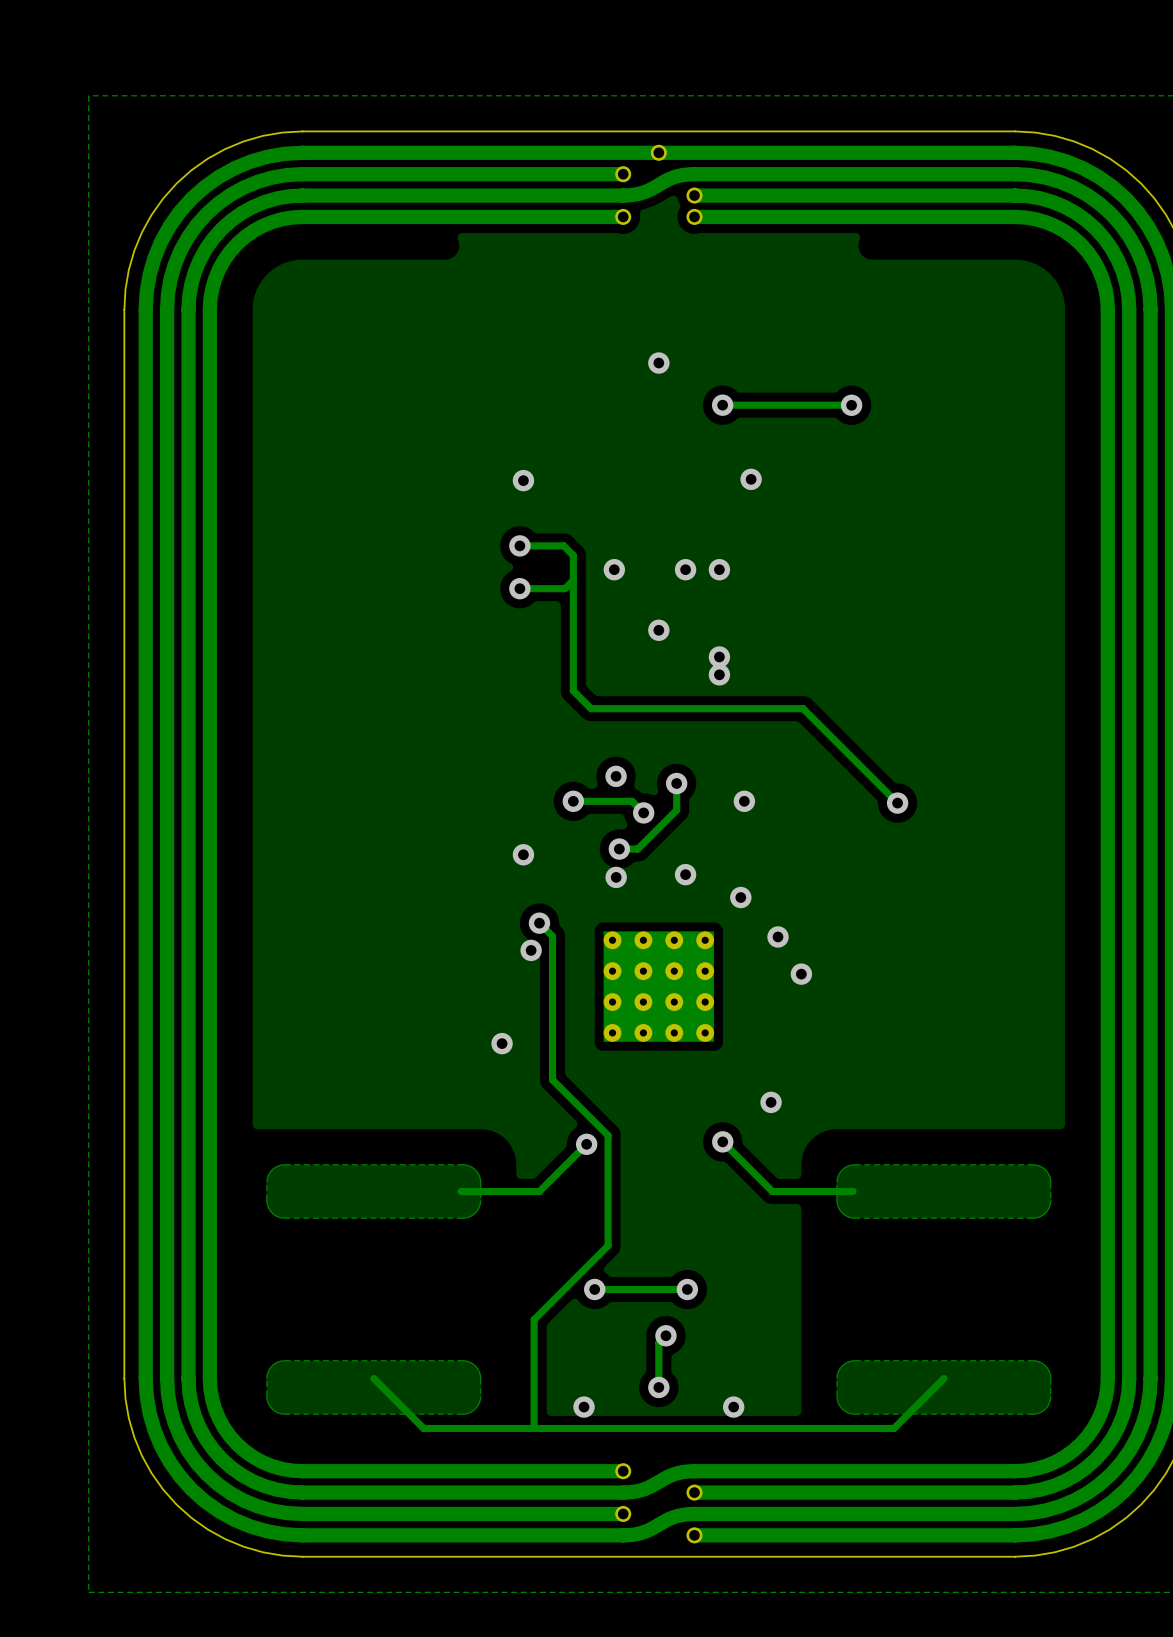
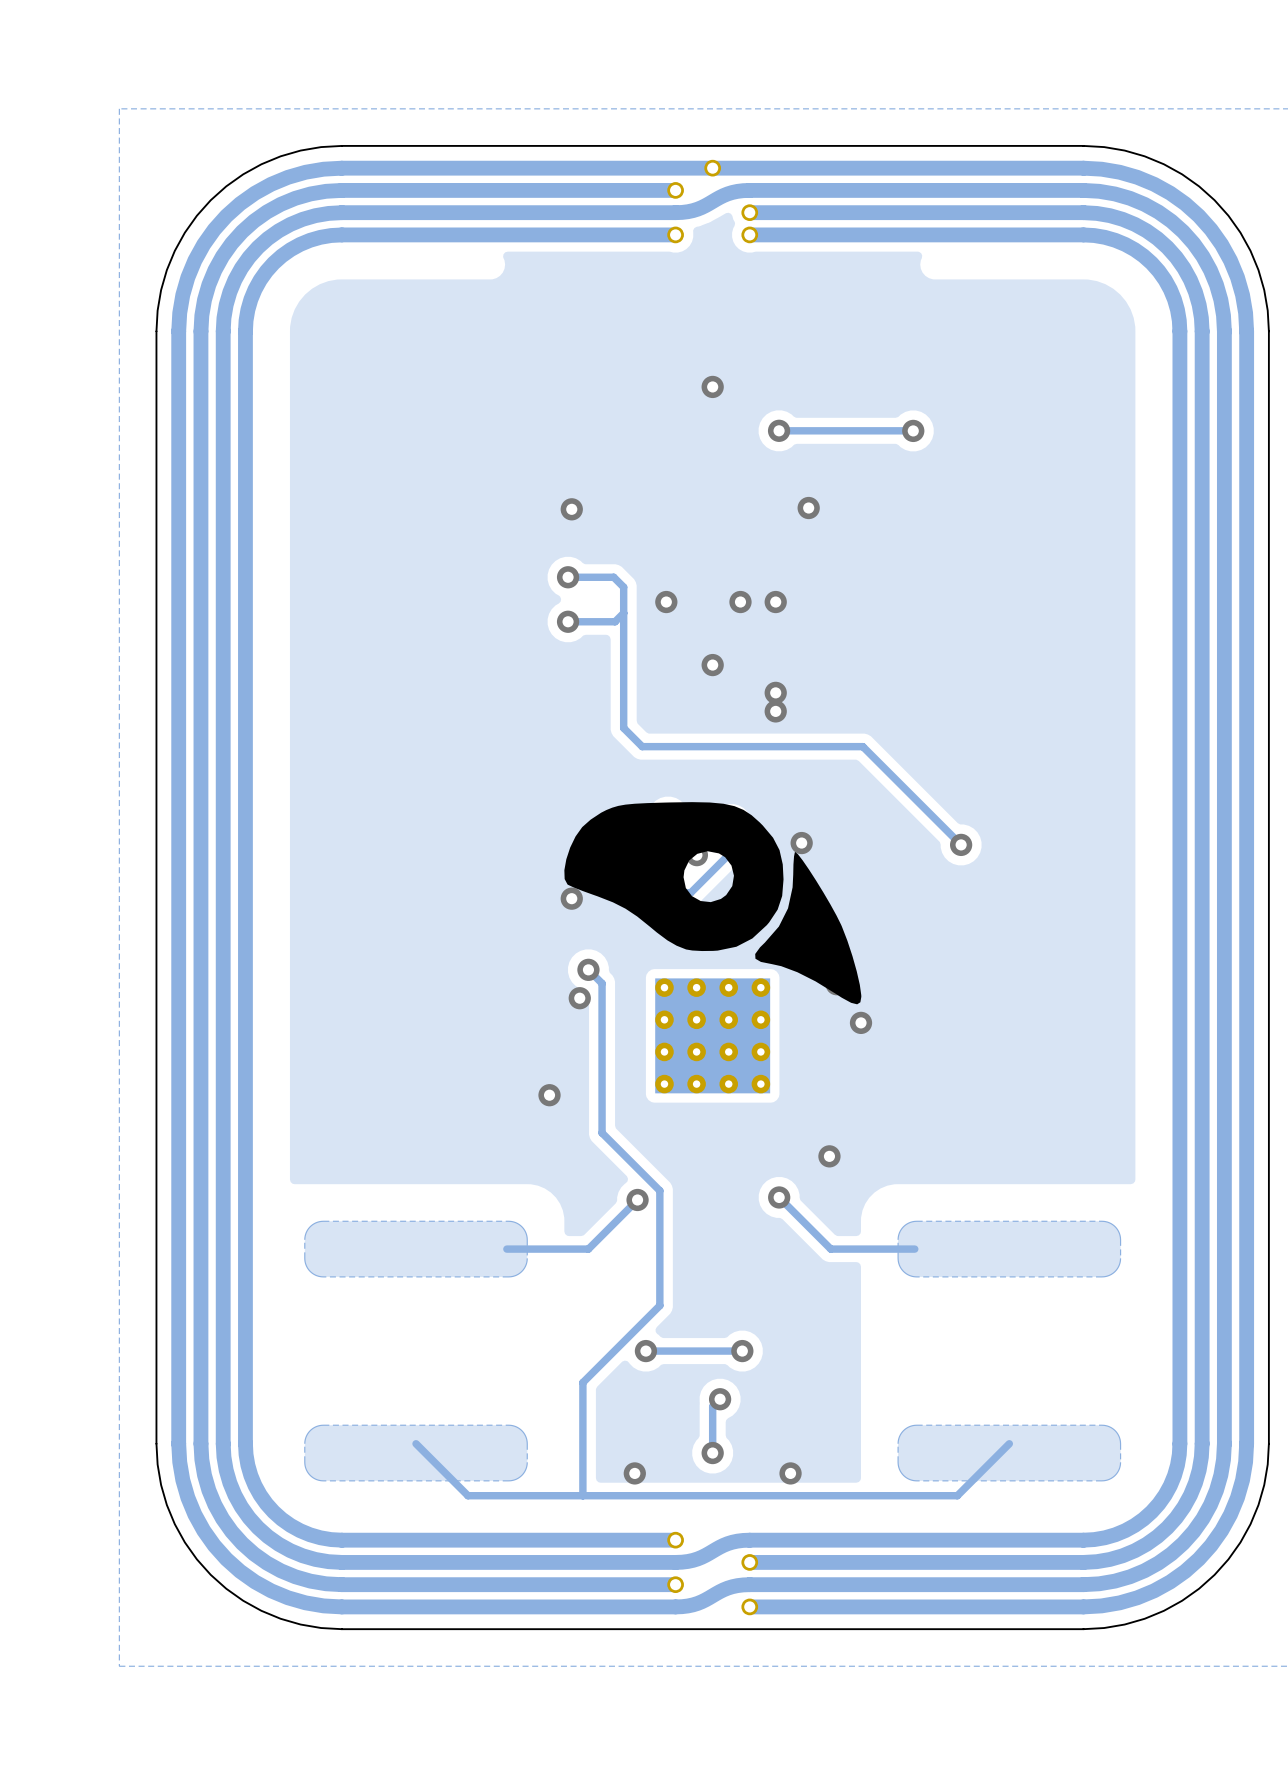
drawing: none -> [564, 802, 862, 1005]

